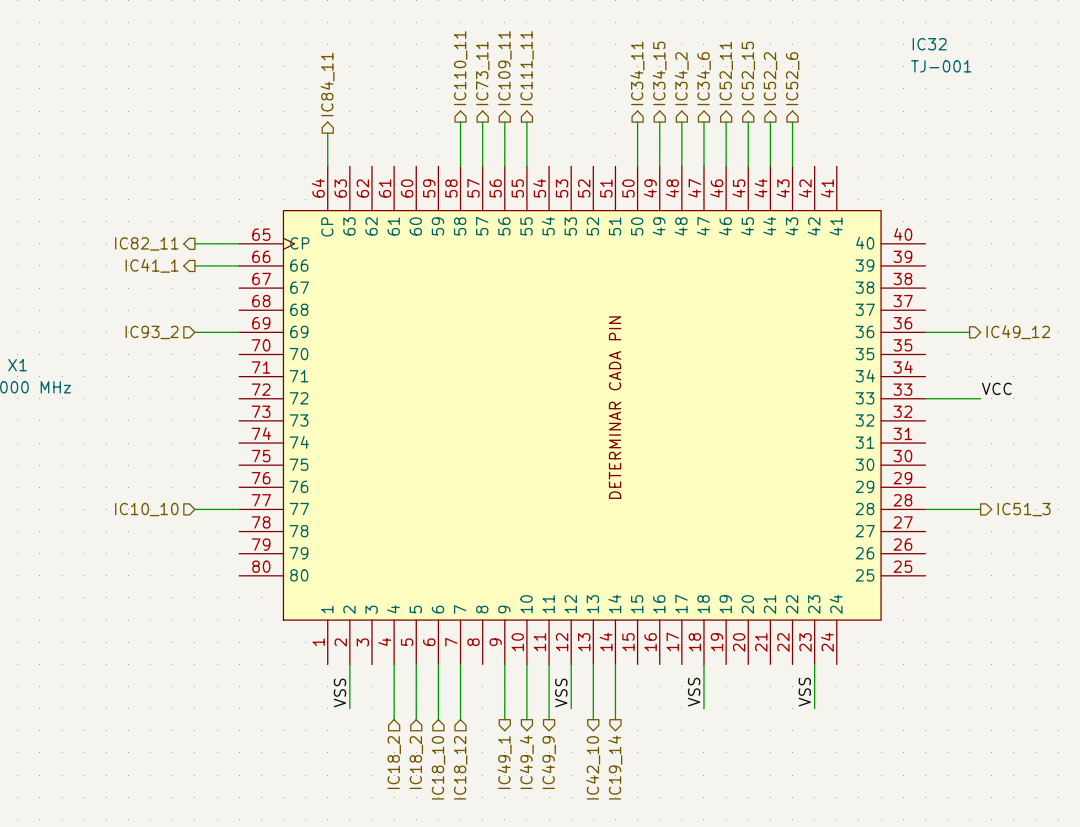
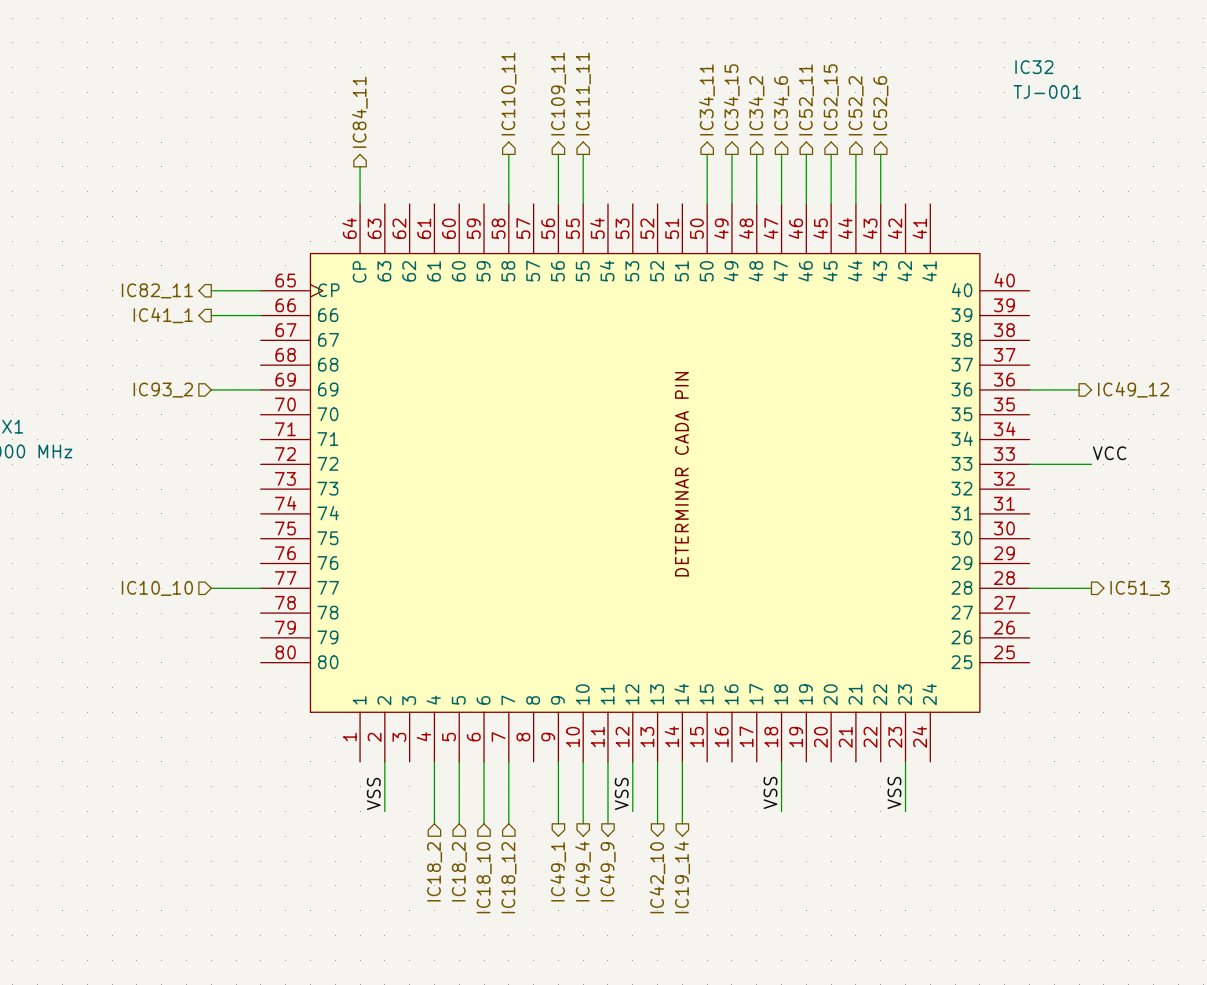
hierarchical label: IC73_11 (482, 73) -> none
wire: (482, 122) (482, 166) -> none

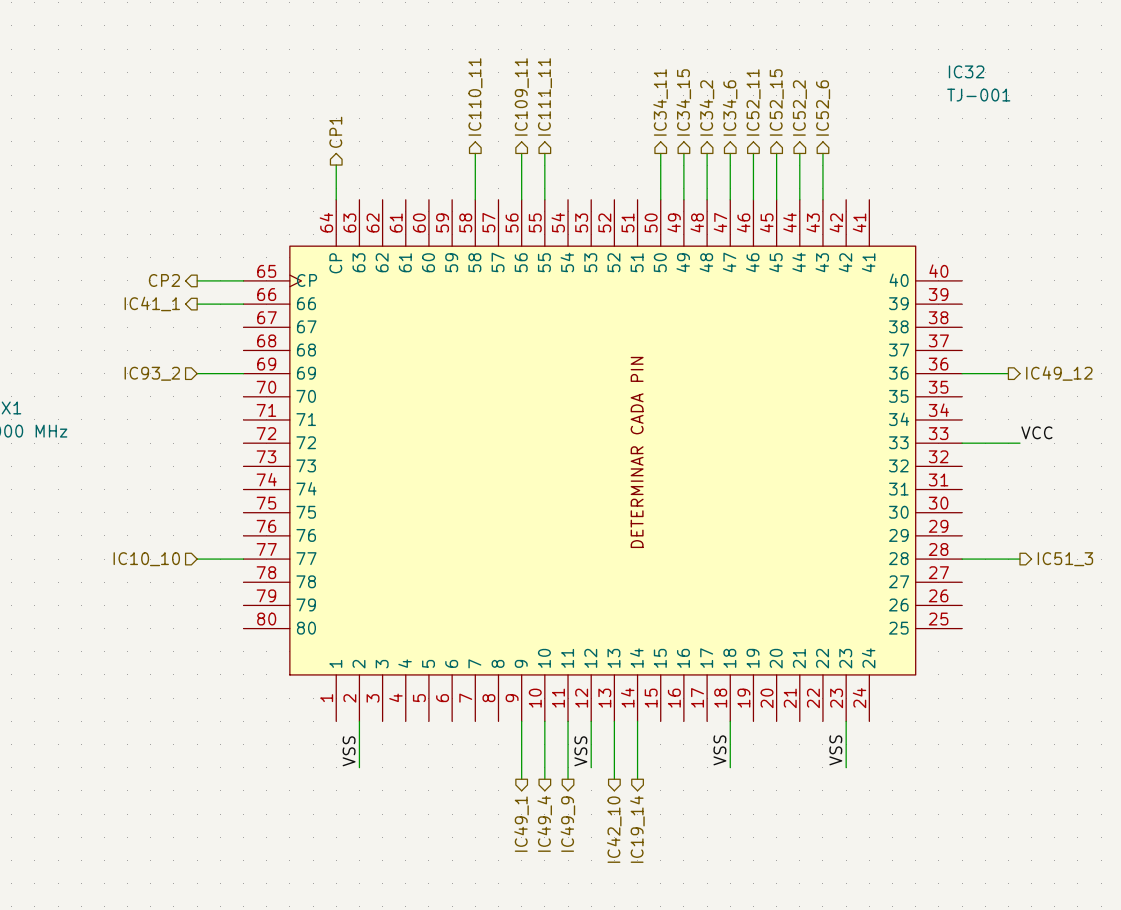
hierarchical label: IC84_11 (359, 112) -> CP1 (335, 132)
hierarchical label: IC82_11 (157, 290) -> CP2 (164, 280)
wire: (434, 761) (434, 823) -> none
wire: (459, 761) (459, 823) -> none
wire: (484, 761) (484, 823) -> none
wire: (508, 761) (508, 823) -> none
hierarchical label: IC18_2 (434, 871) -> none
hierarchical label: IC18_2 (459, 871) -> none
hierarchical label: IC18_10 (484, 877) -> none
hierarchical label: IC18_12 (508, 877) -> none

